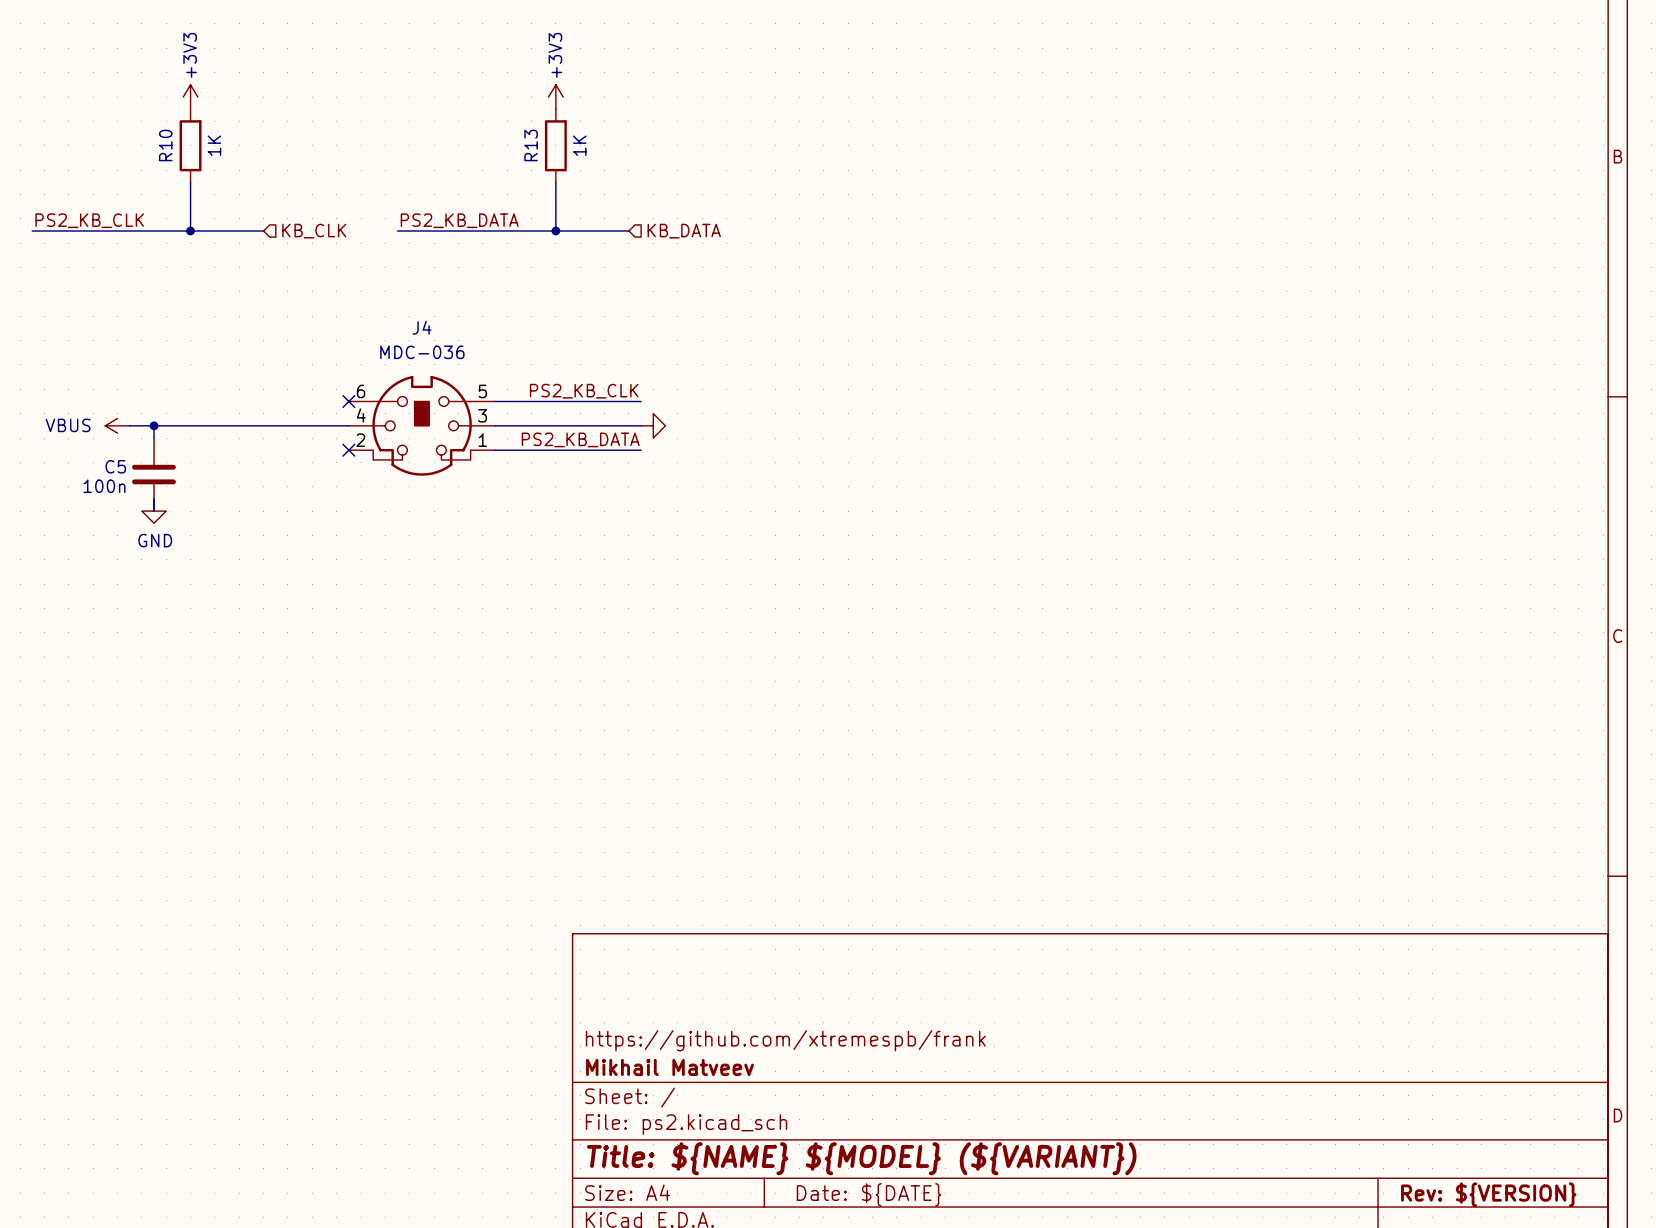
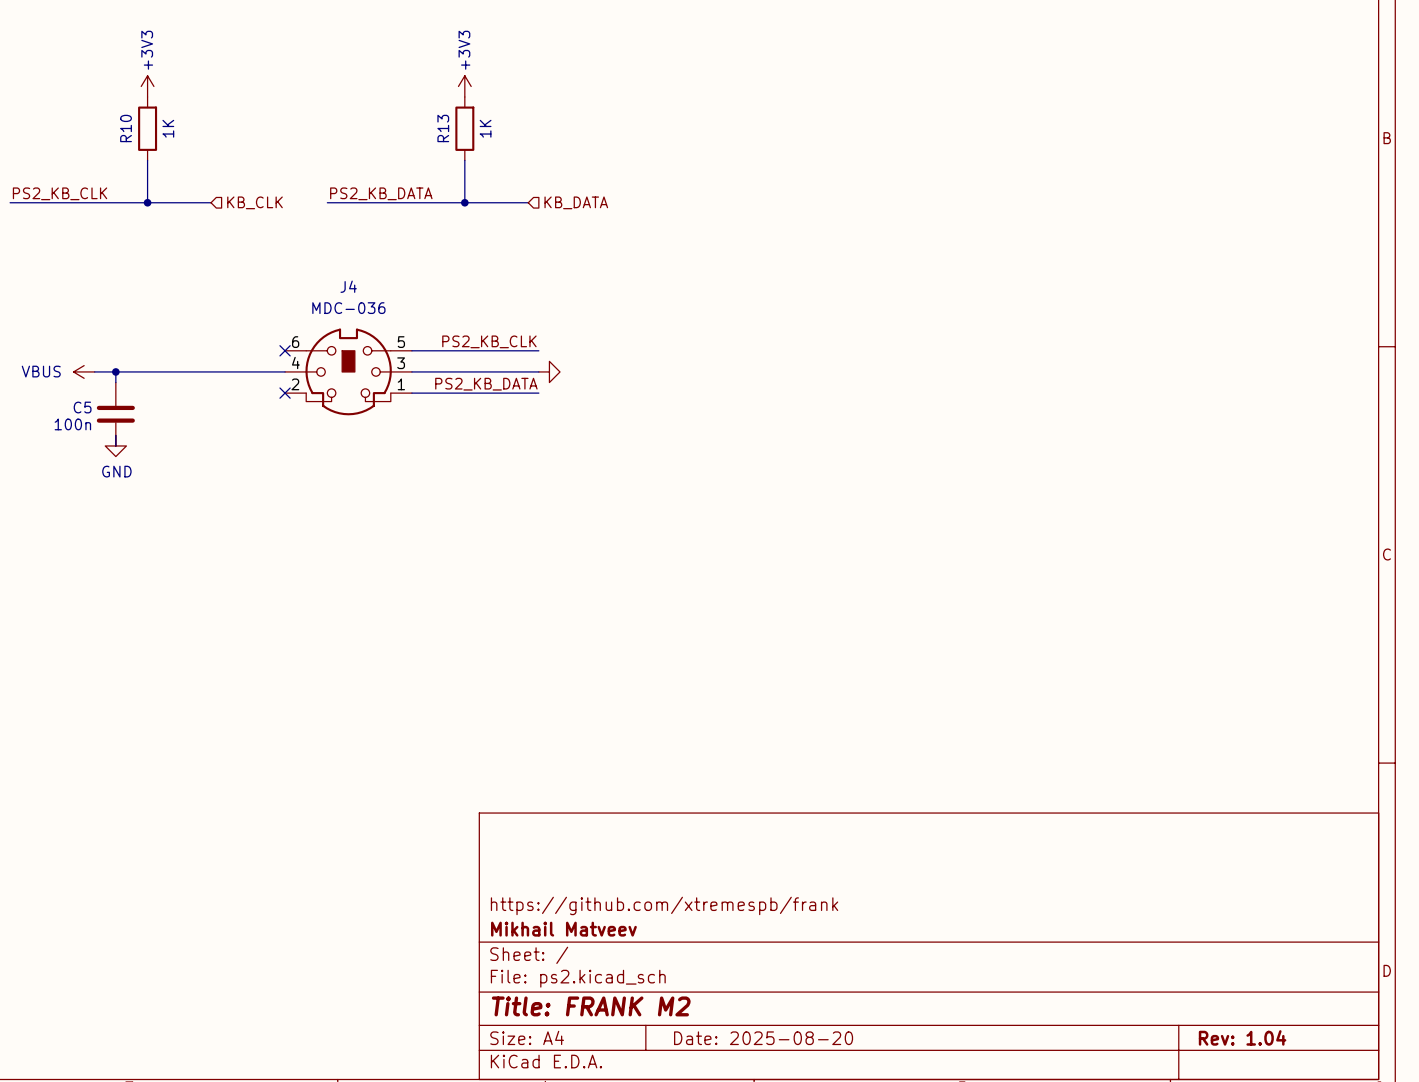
title block: Title: ${NAME} ${MODEL} (${VARIANT}) (861, 1158) -> Title: FRANK M2 (591, 1006)
title block: Date: ${DATE} (869, 1194) -> Date: 2025-08-20 (763, 1038)
title block: Rev: ${VERSION} (1488, 1194) -> Rev: 1.04 (1242, 1037)

